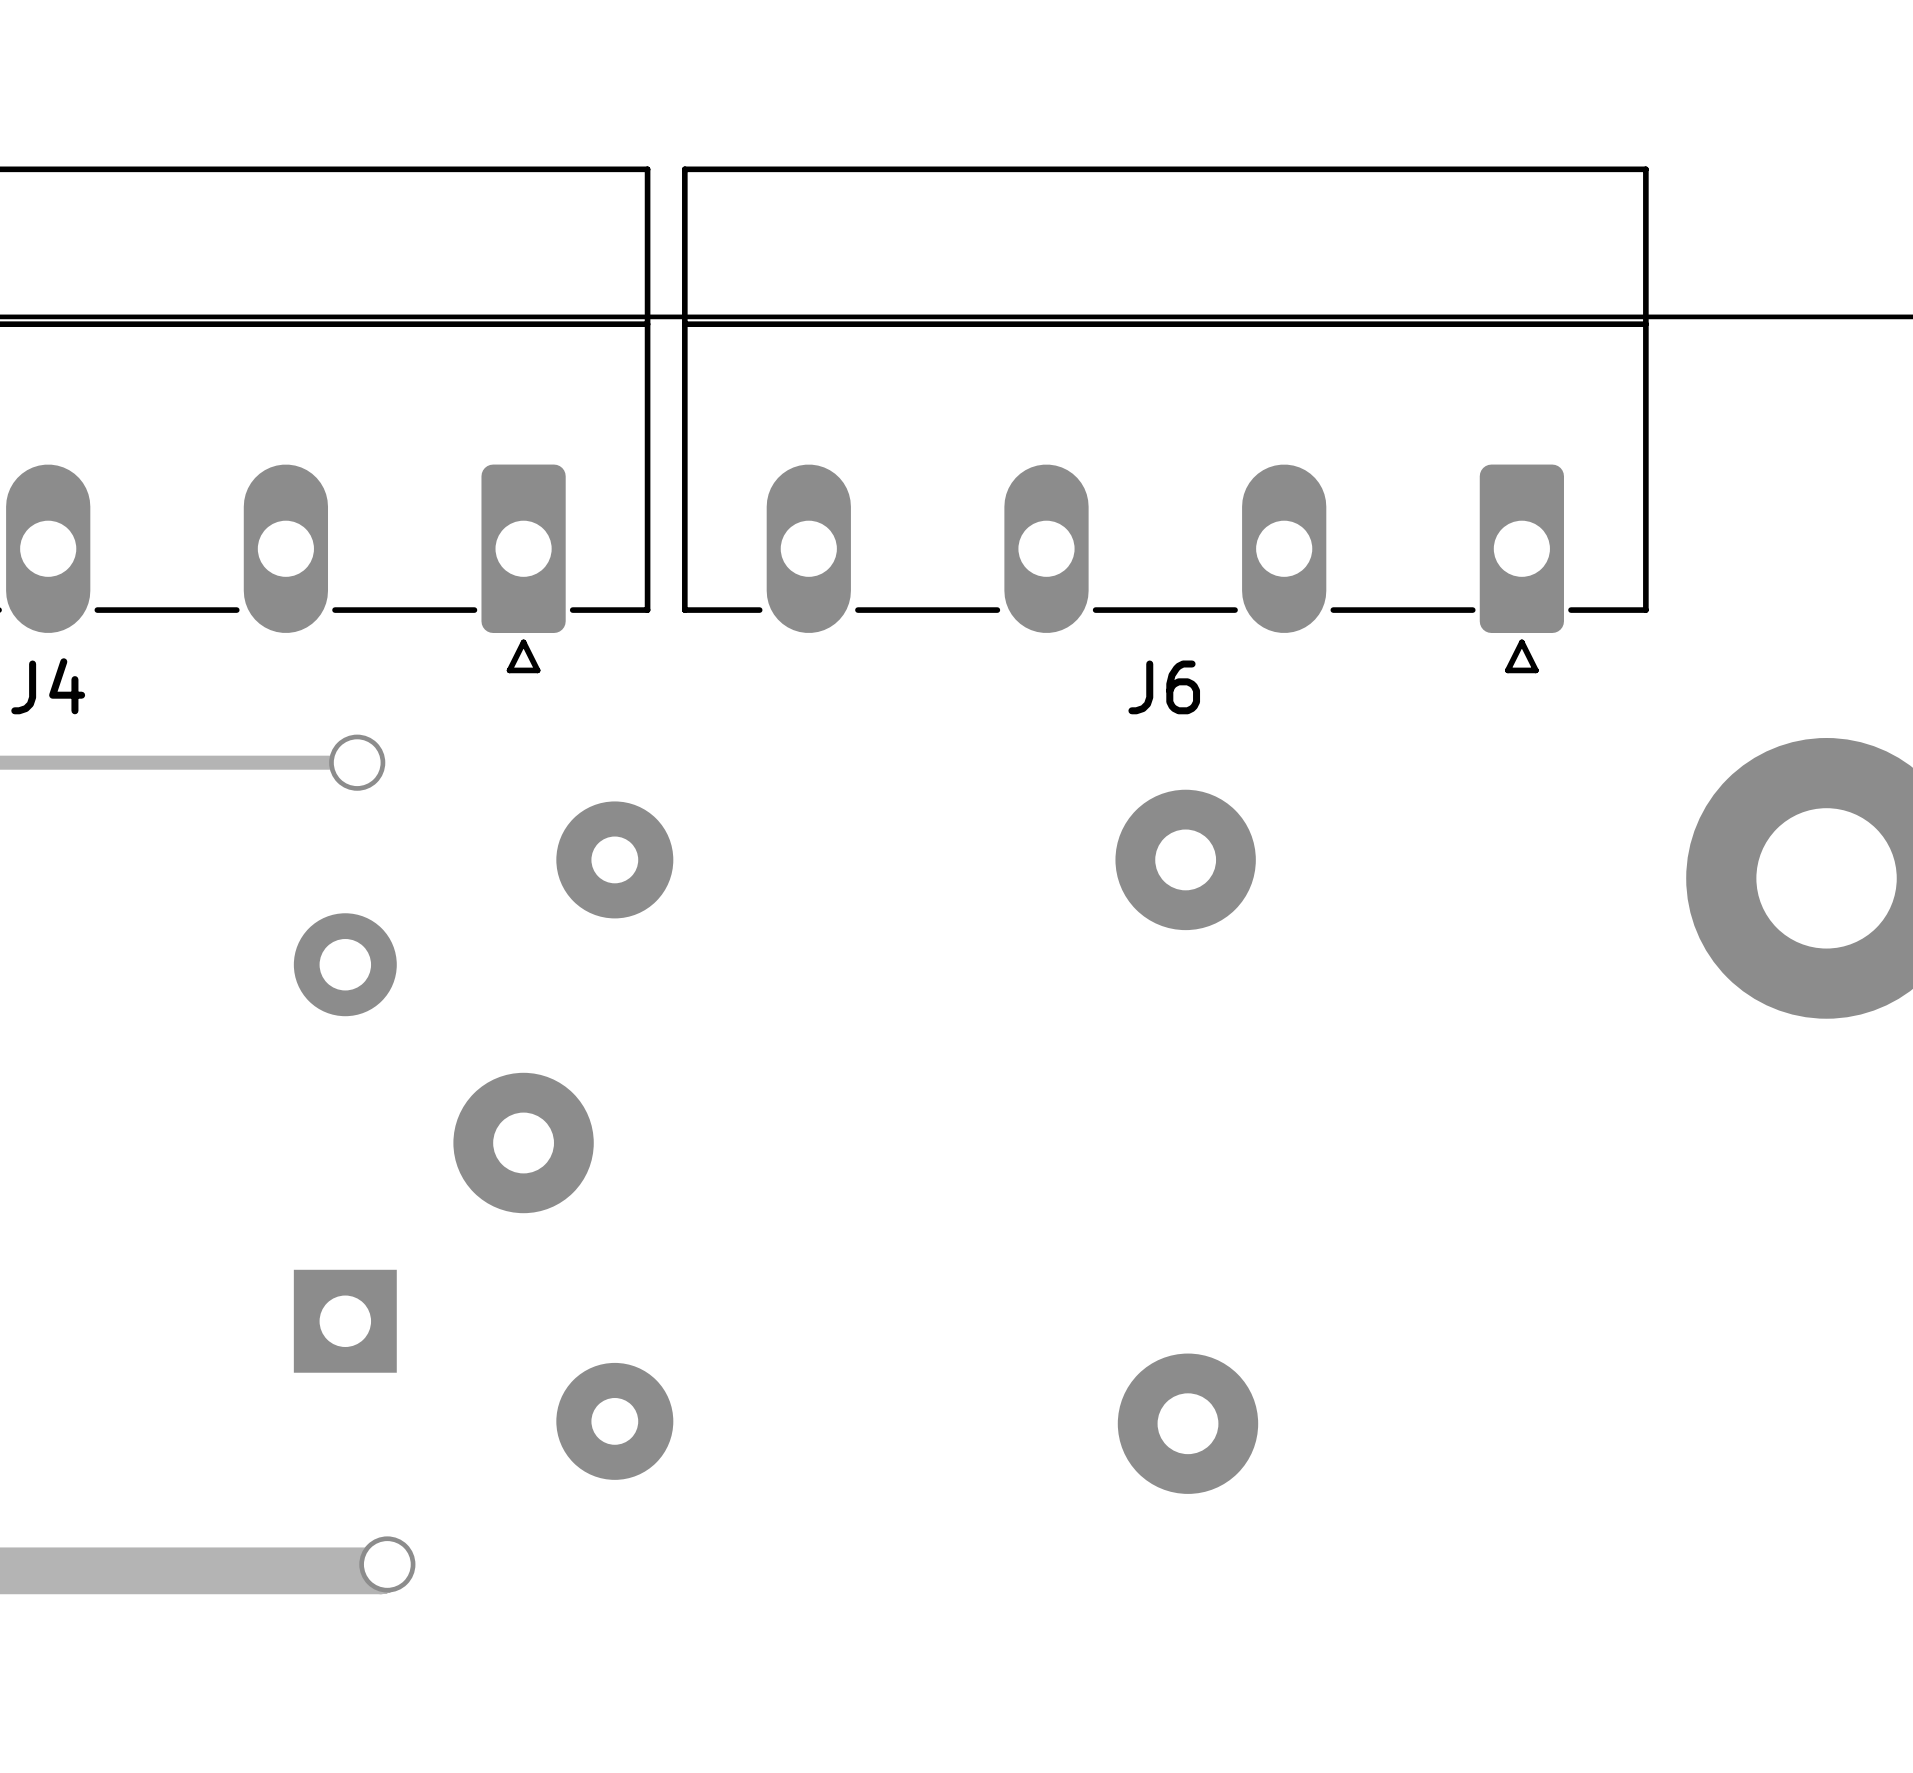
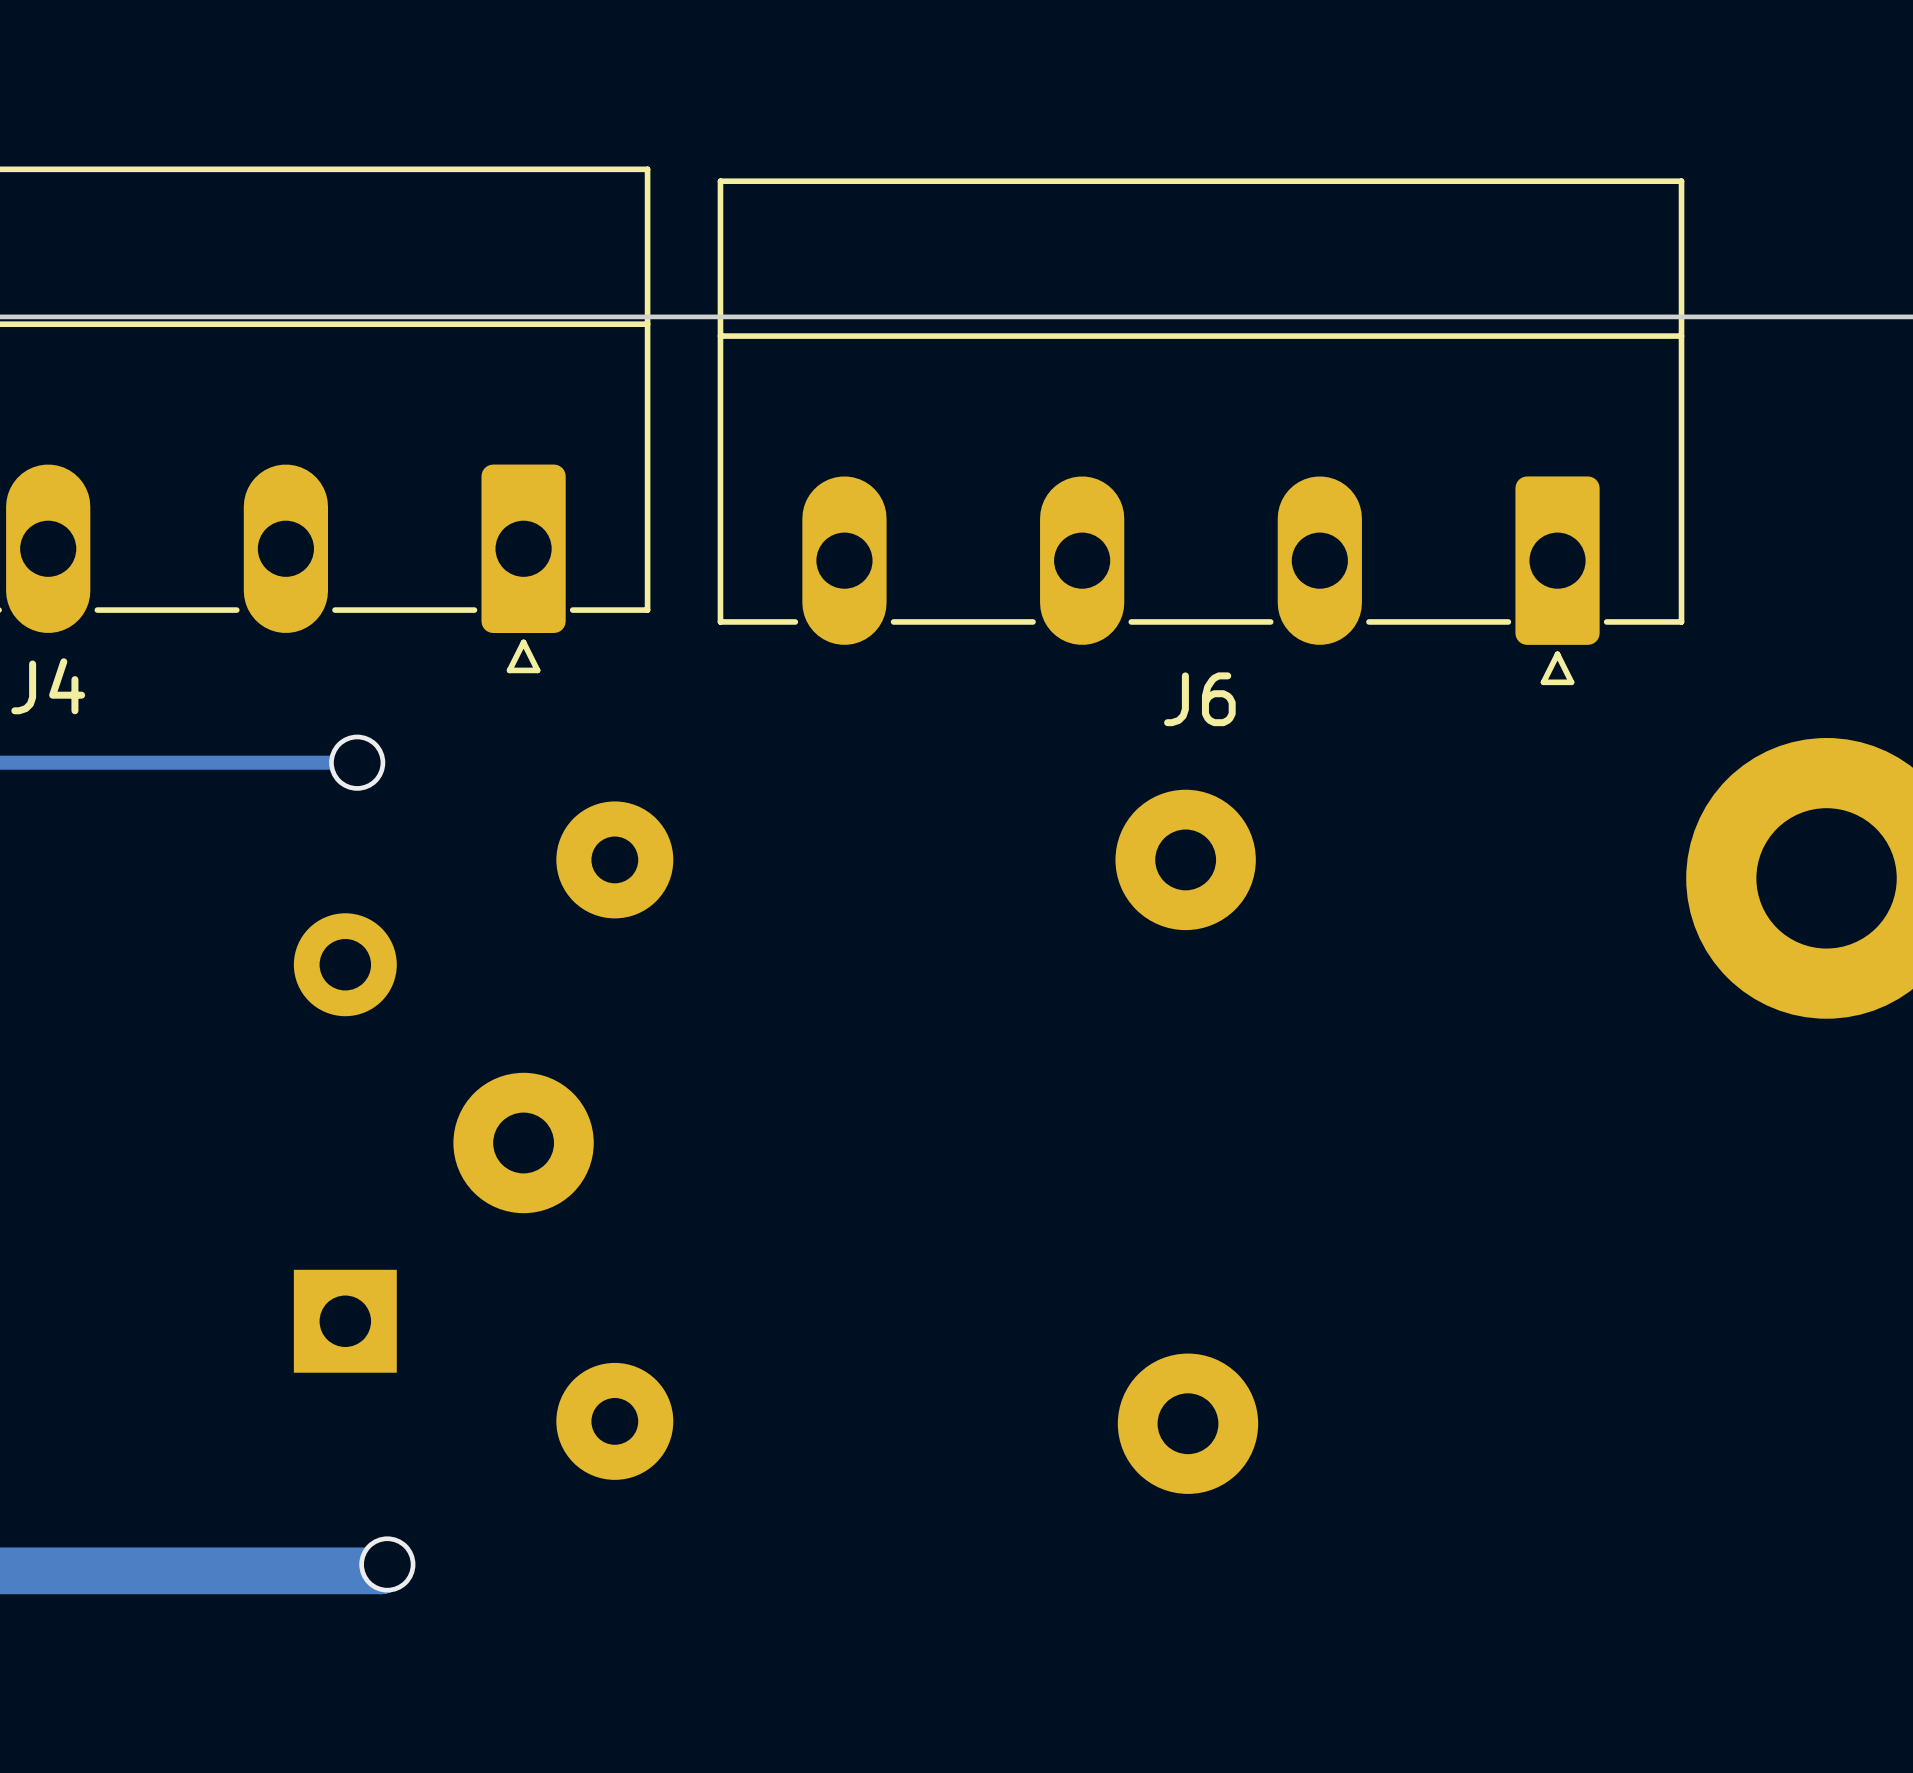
J6 position: (1165, 419) -> (1200, 431)

